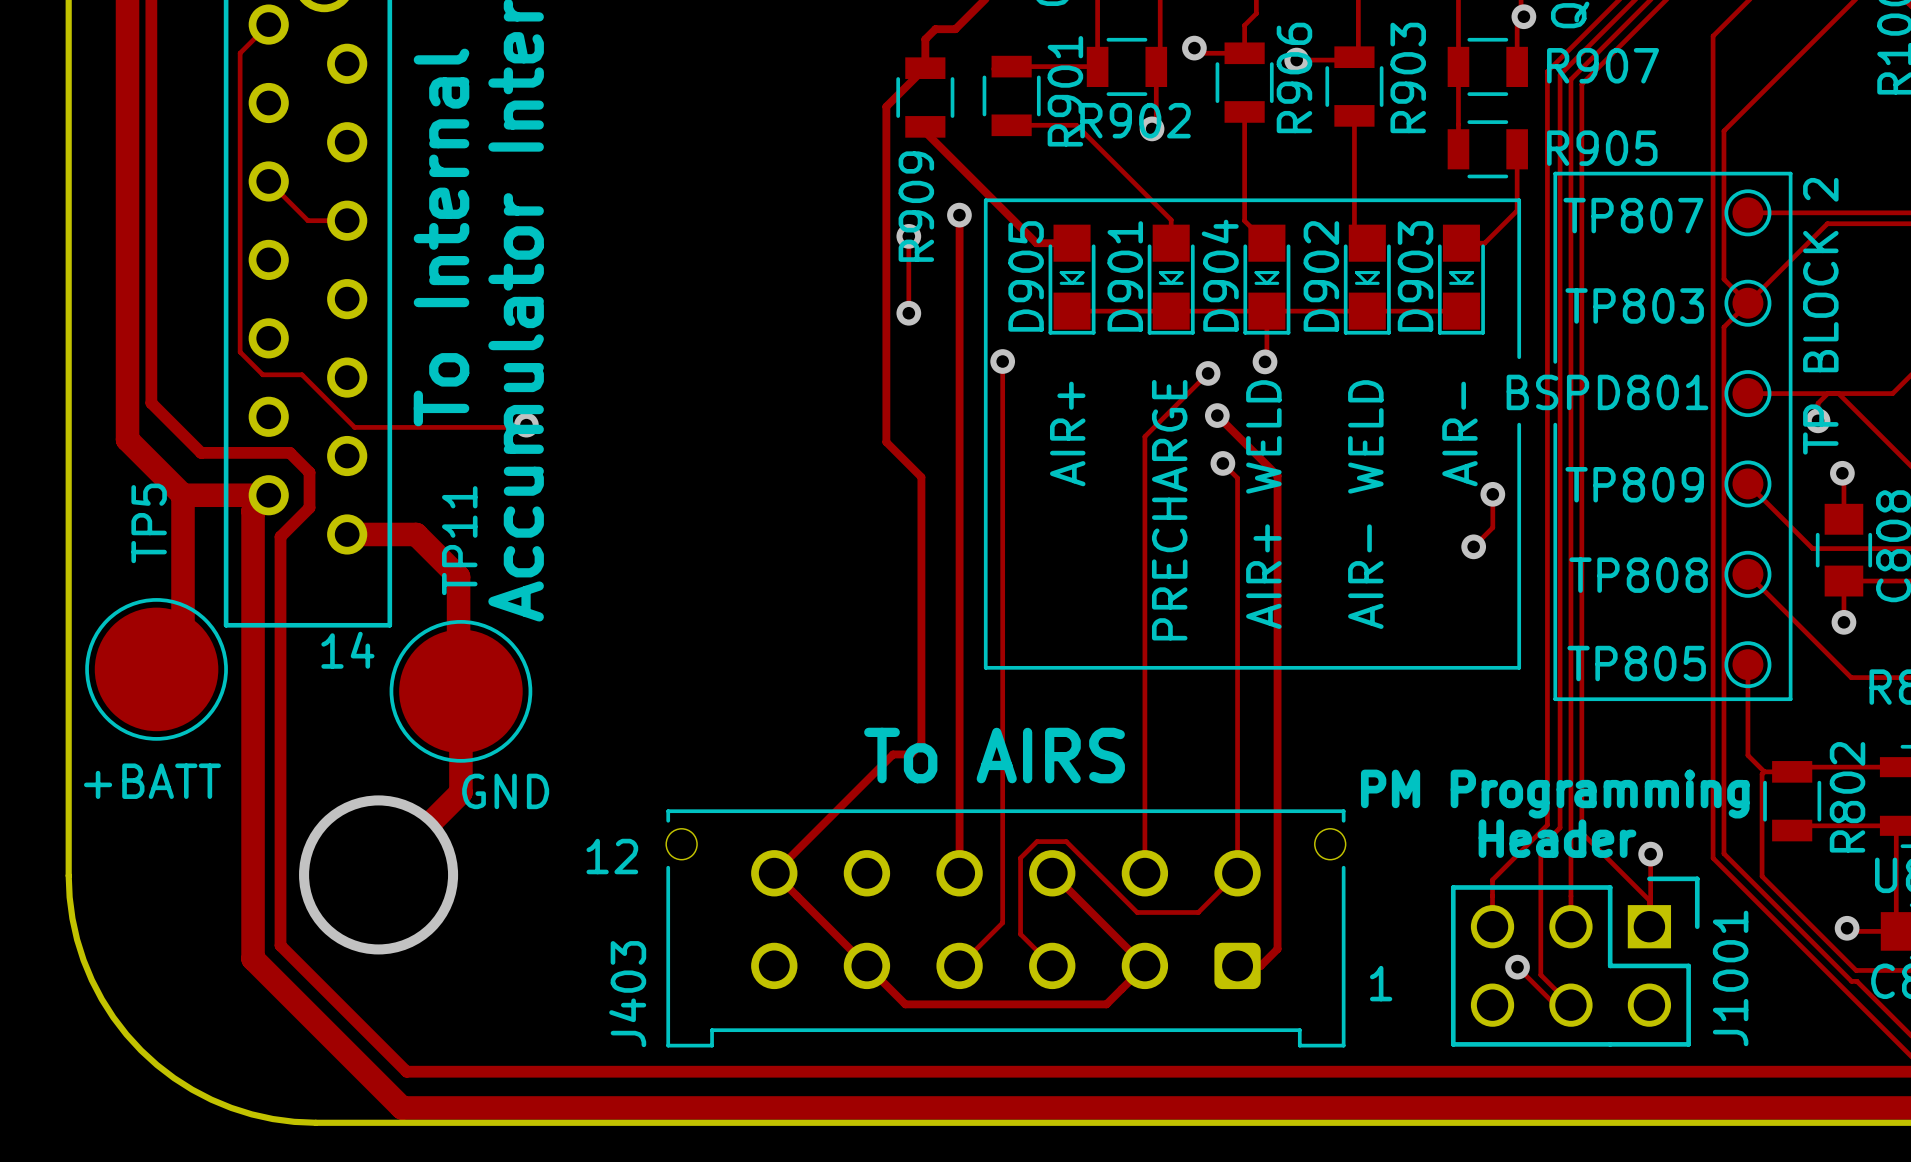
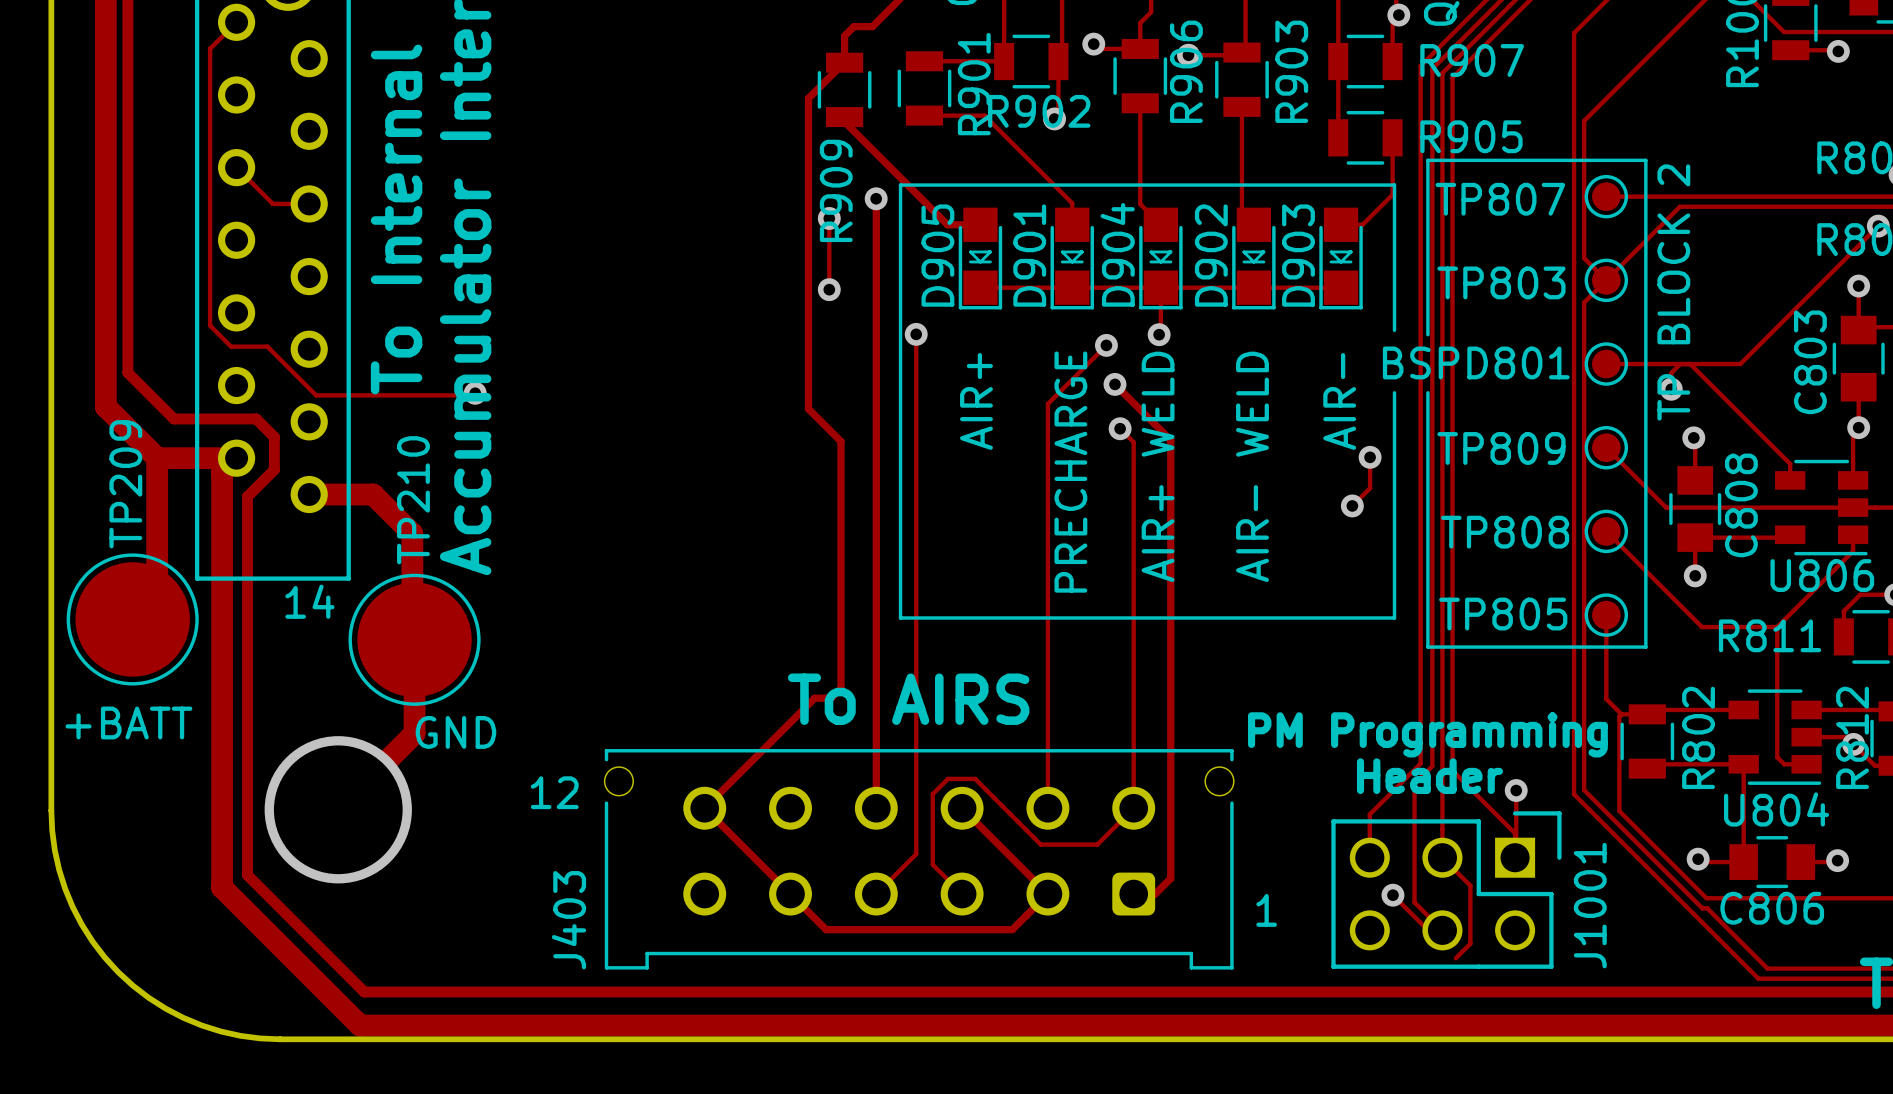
TP5 name: TP5 (149, 523) -> TP209 (125, 484)
TP11 name: TP11 (459, 540) -> TP210 (413, 500)
track: none -> (1442, 857) (1470, 885) (1470, 943) (1455, 958)

